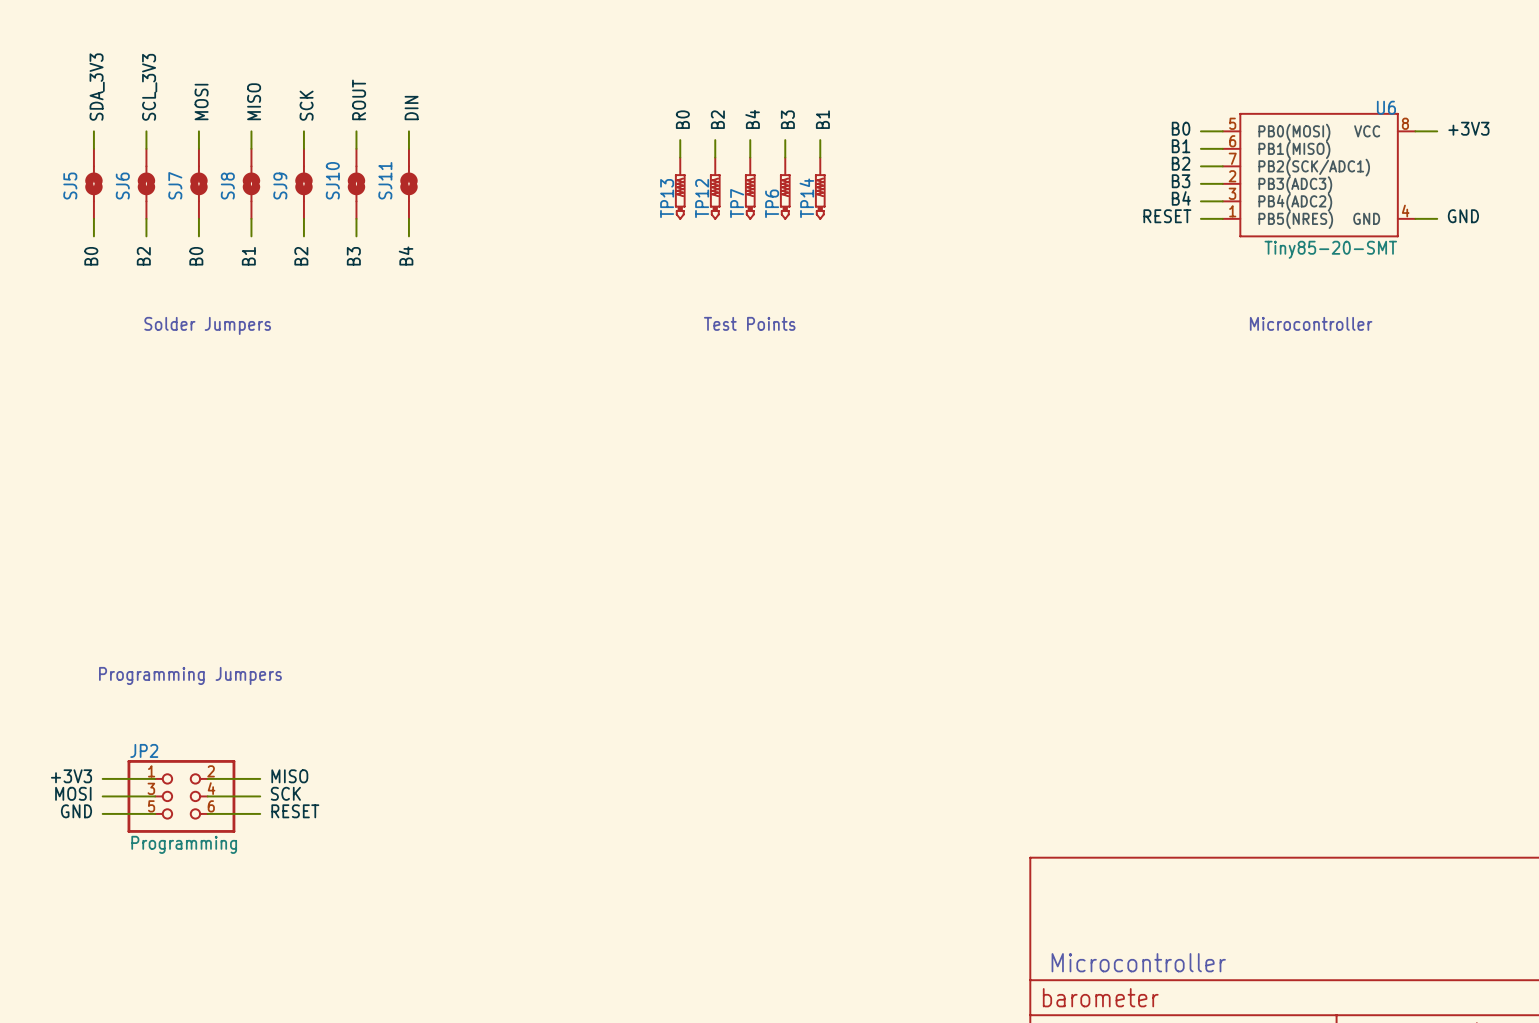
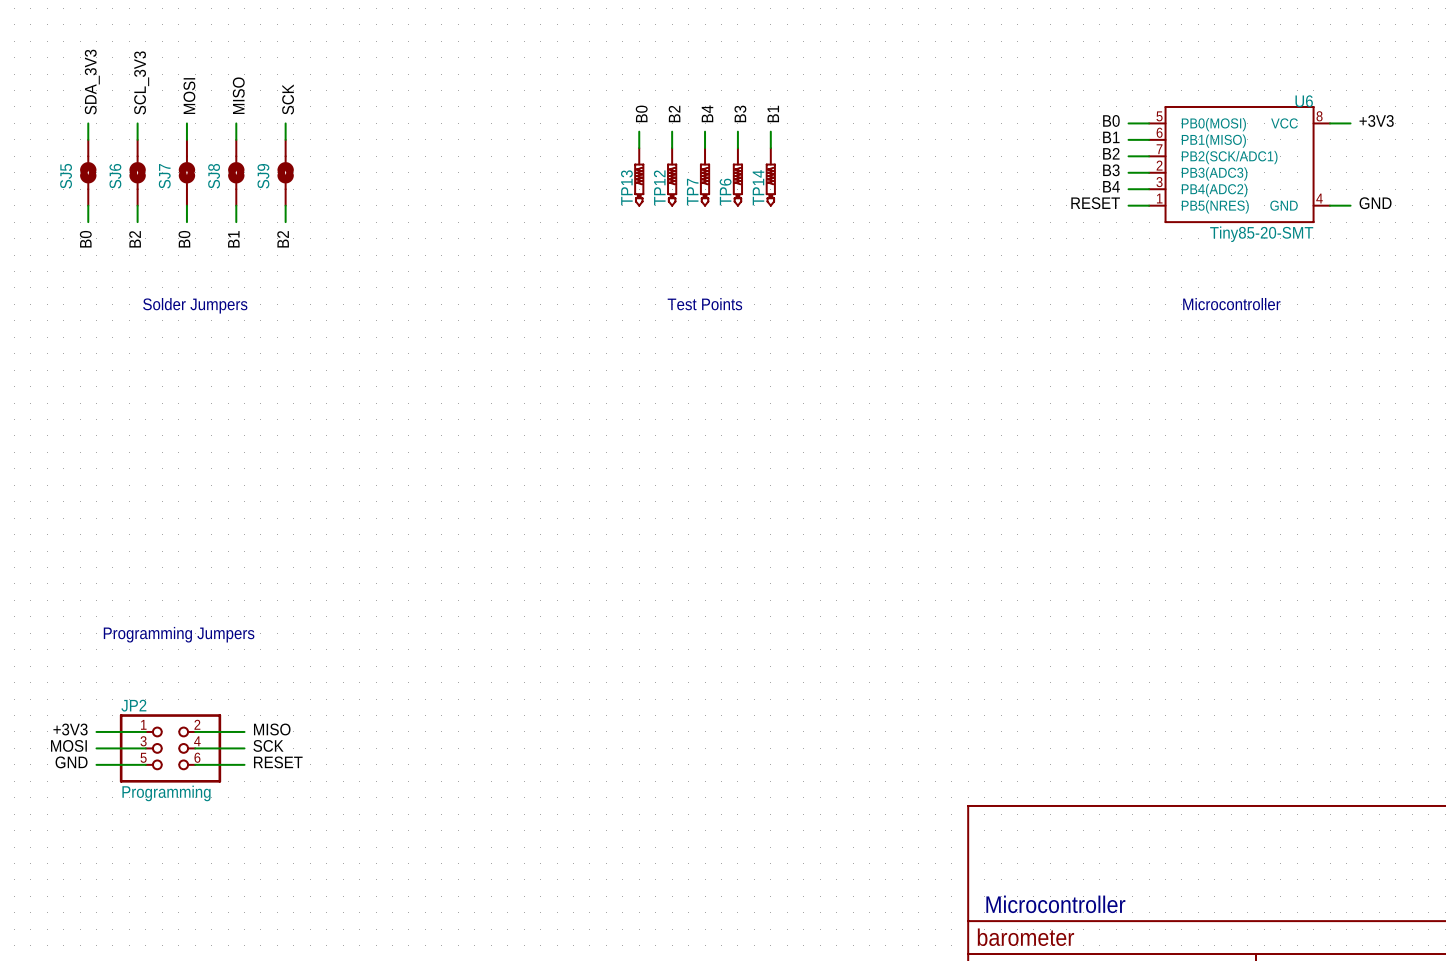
label: ROUT (359, 99) -> none
label: DIN (411, 108) -> none
wire: (356, 131) (356, 148) -> none
wire: (408, 131) (408, 148) -> none
SJ10: (356, 183) -> none
SJ11: (408, 183) -> none
wire: (356, 218) (356, 236) -> none
wire: (408, 218) (408, 236) -> none
label: B3 (353, 256) -> none
label: B4 (406, 256) -> none

